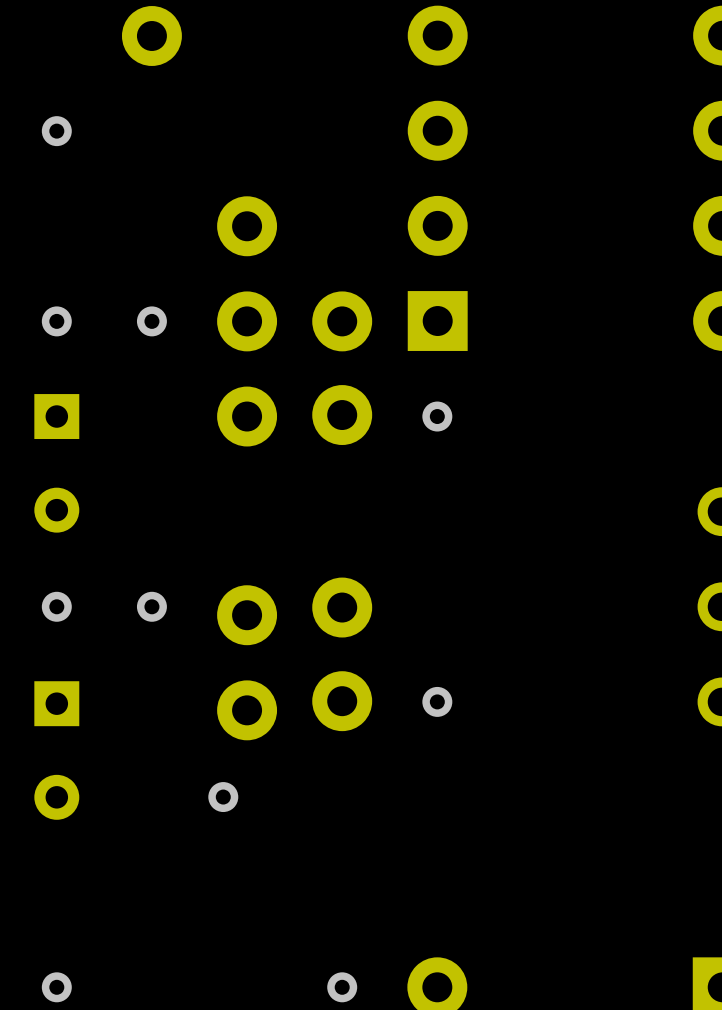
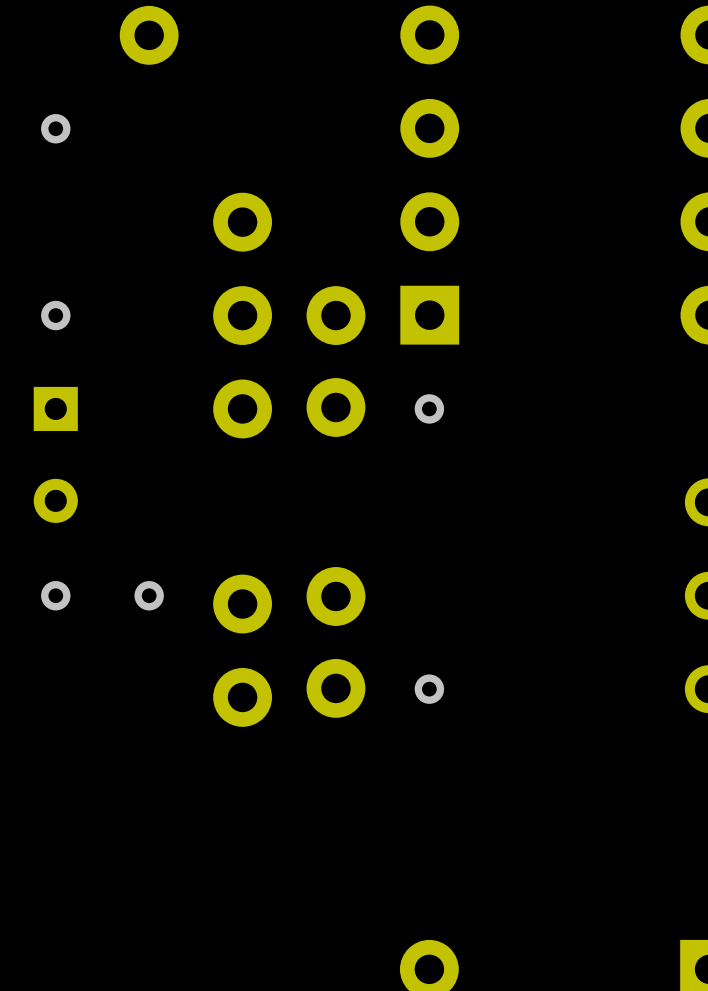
via: (151, 321) -> none
part: (56, 750) -> none
via: (223, 797) -> none
via: (56, 987) -> none
via: (342, 987) -> none

